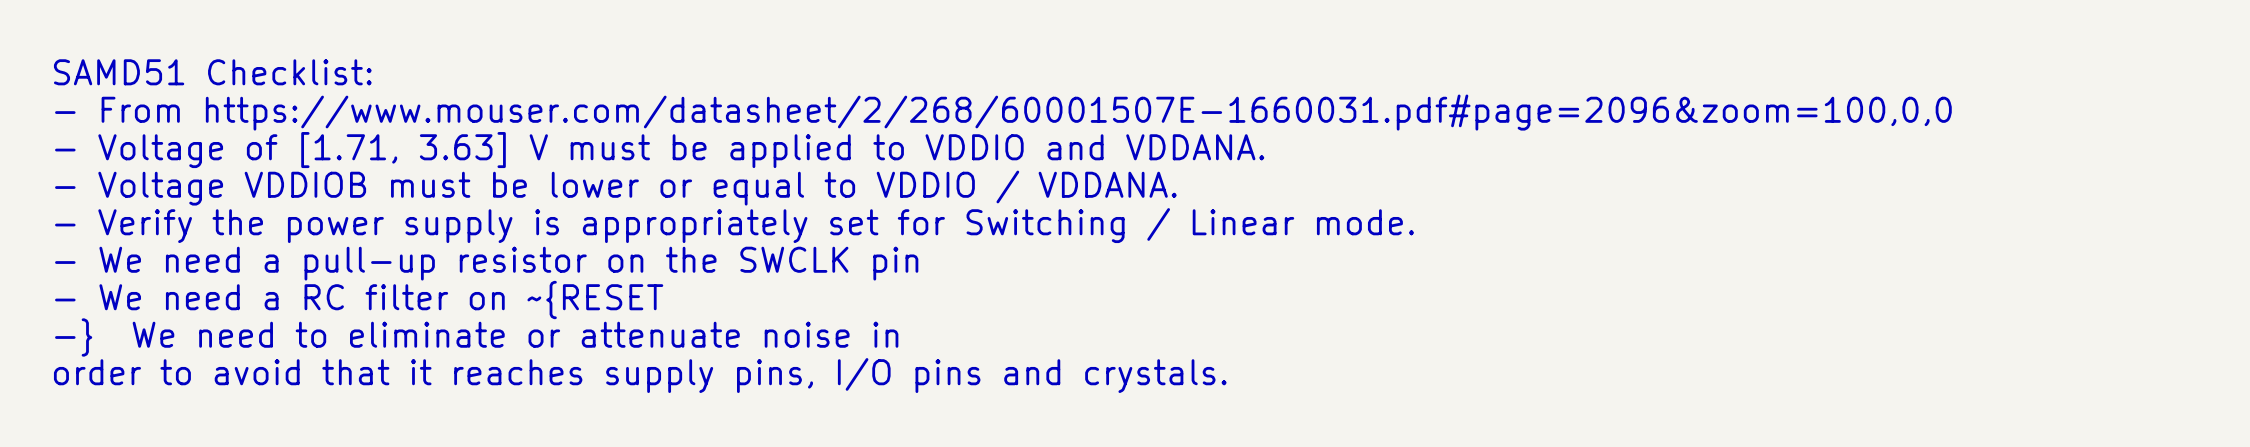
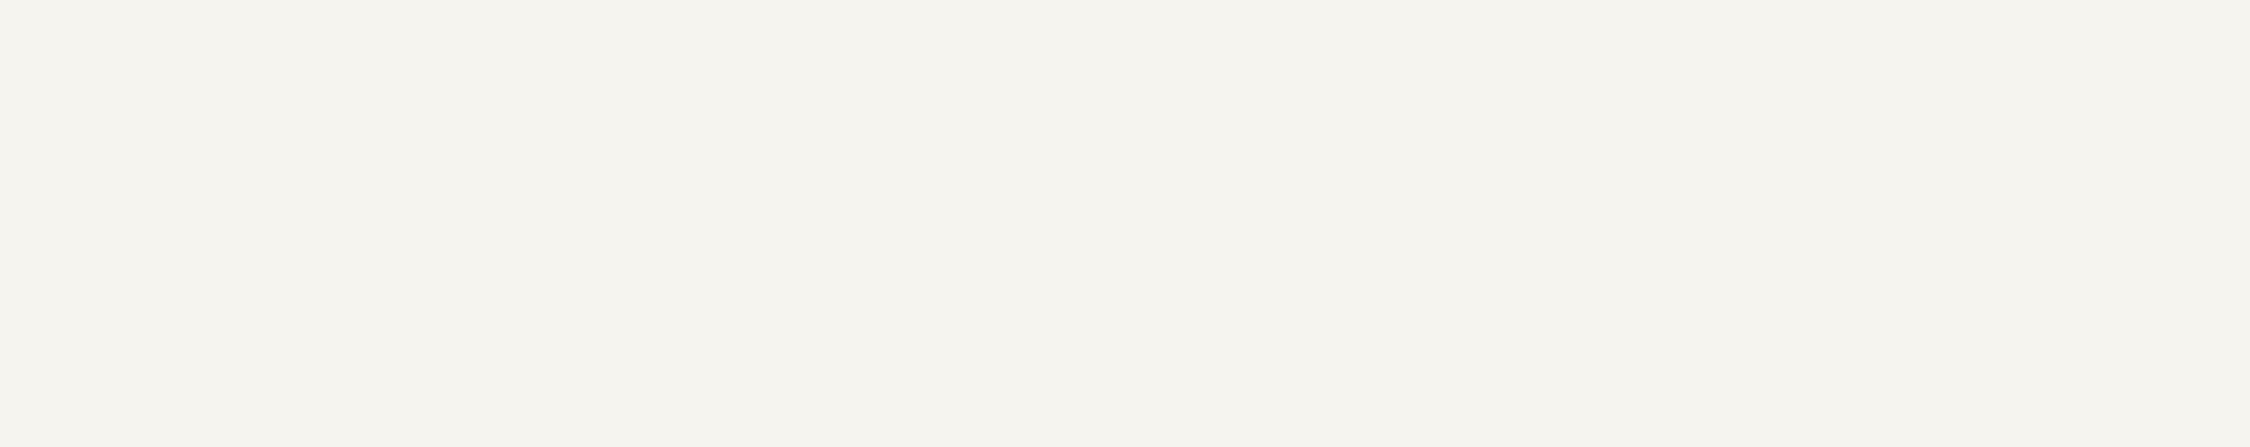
text: SAMD51 Checklist: (212, 72) -> none
text: - From https://www.mouser.com/datasheet/2/268/60001507E-1660031.pdf#page=2096&zoom=100,0,0 (1003, 112) -> none
text: - Voltage of [1.71, 3.63] V must be applied to VDDIO and VDDANA. (659, 150) -> none
text: - Voltage VDDIOB must be lower or equal to VDDIO / VDDANA. (615, 188) -> none
text: - Verify the power supply is appropriately set for Switching / Linear mode. (734, 225) -> none
text: - We need a pull-up resistor on the SWCLK pin (486, 263) -> none
text: - We need a RC filter on ~{RESET (359, 300) -> none
text: -} We need to eliminate or attenuate noise in (476, 337) -> none
text: order to avoid that it reaches supply pins, I/O pins and crystals. (640, 375) -> none

